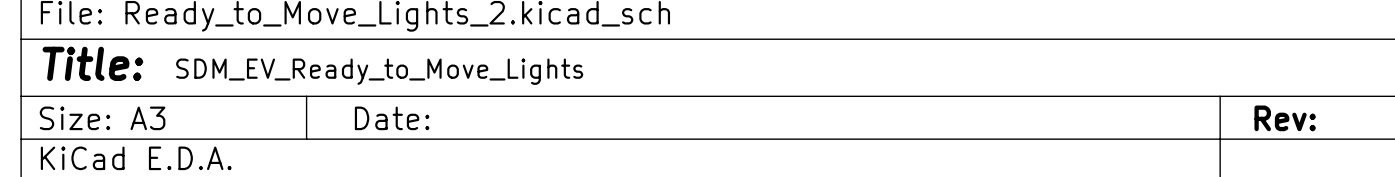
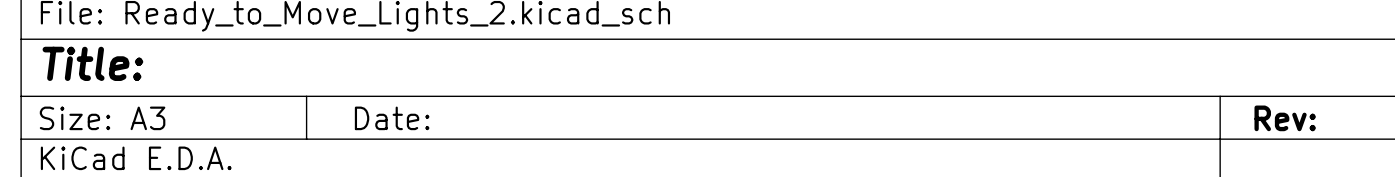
text: SDM_EV_Ready_to_Move_Lights (379, 71) -> none

